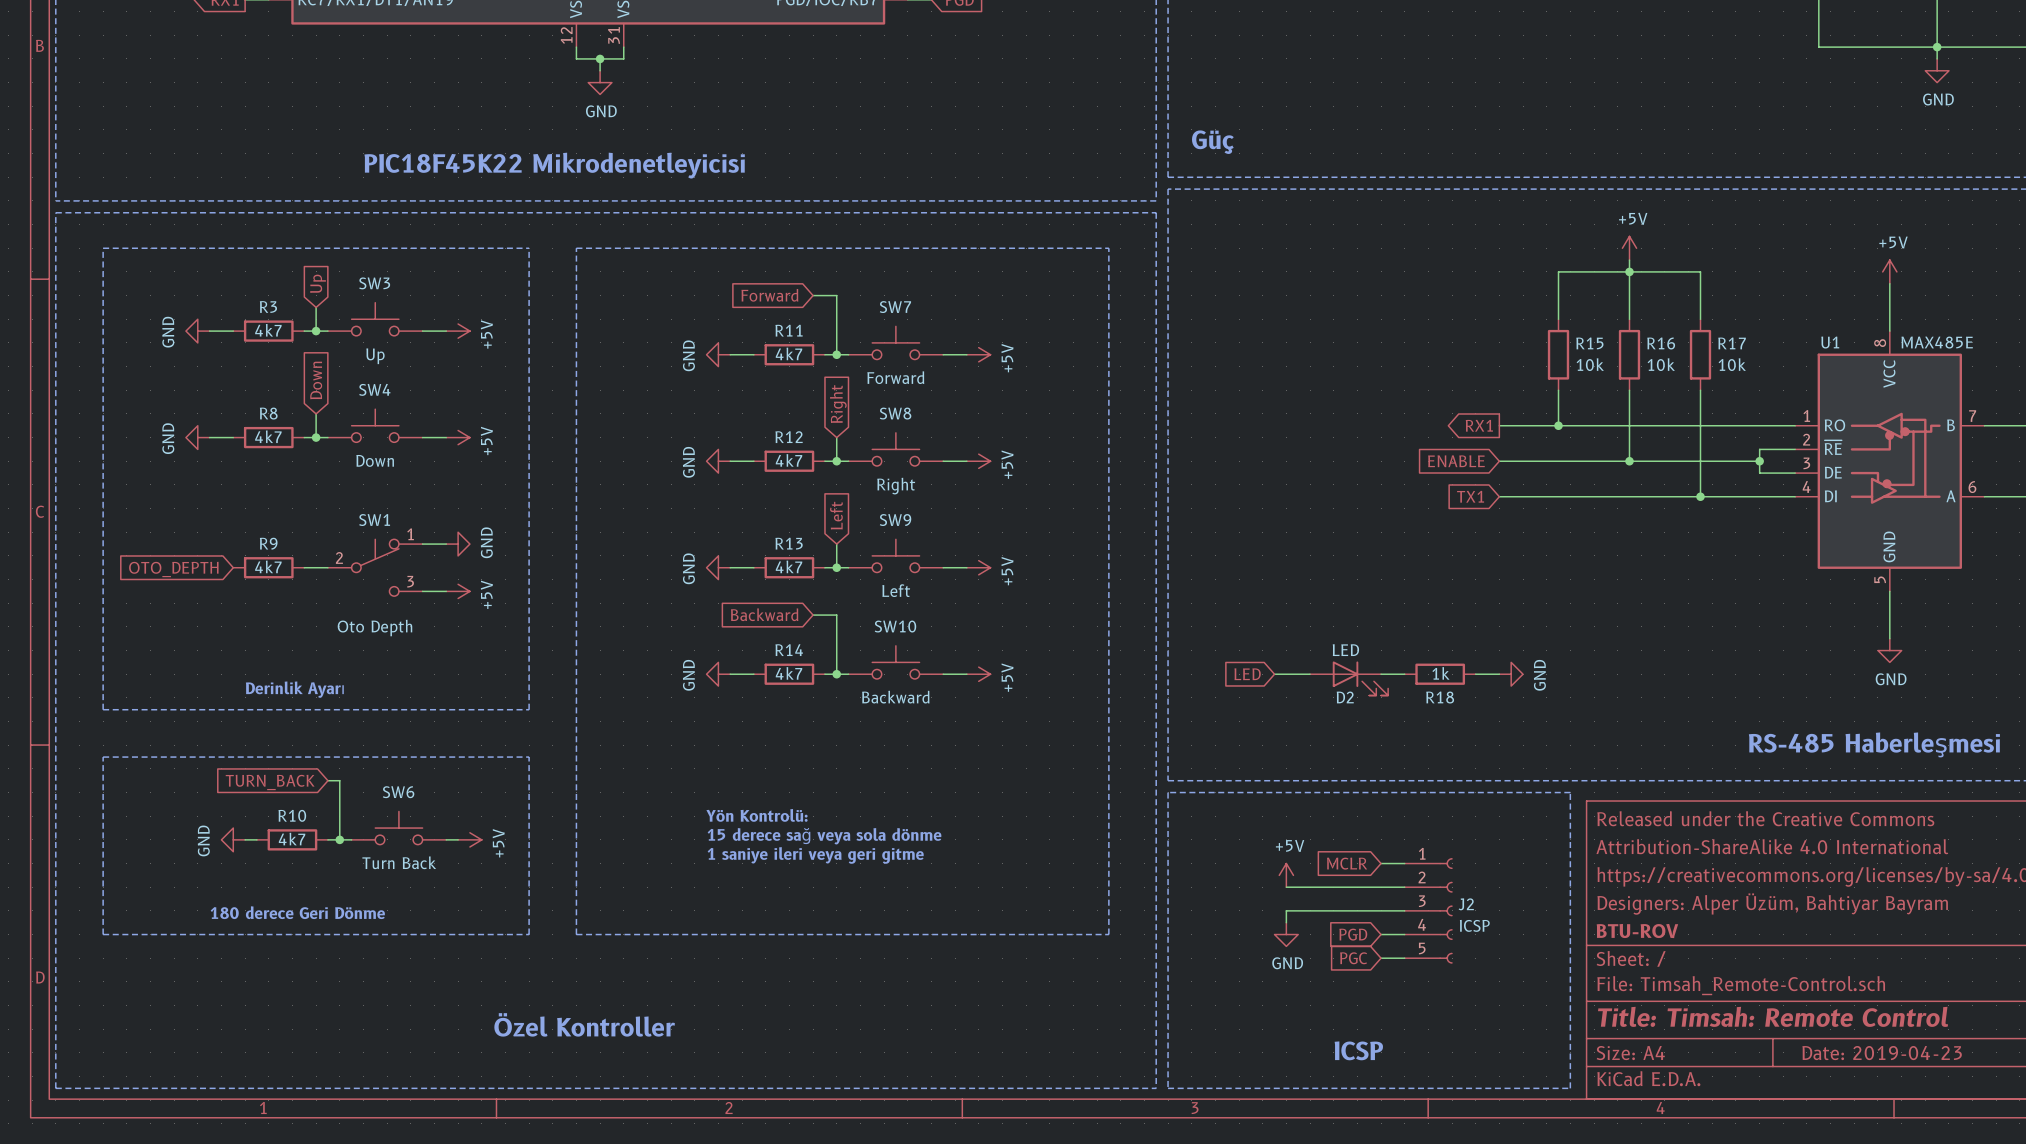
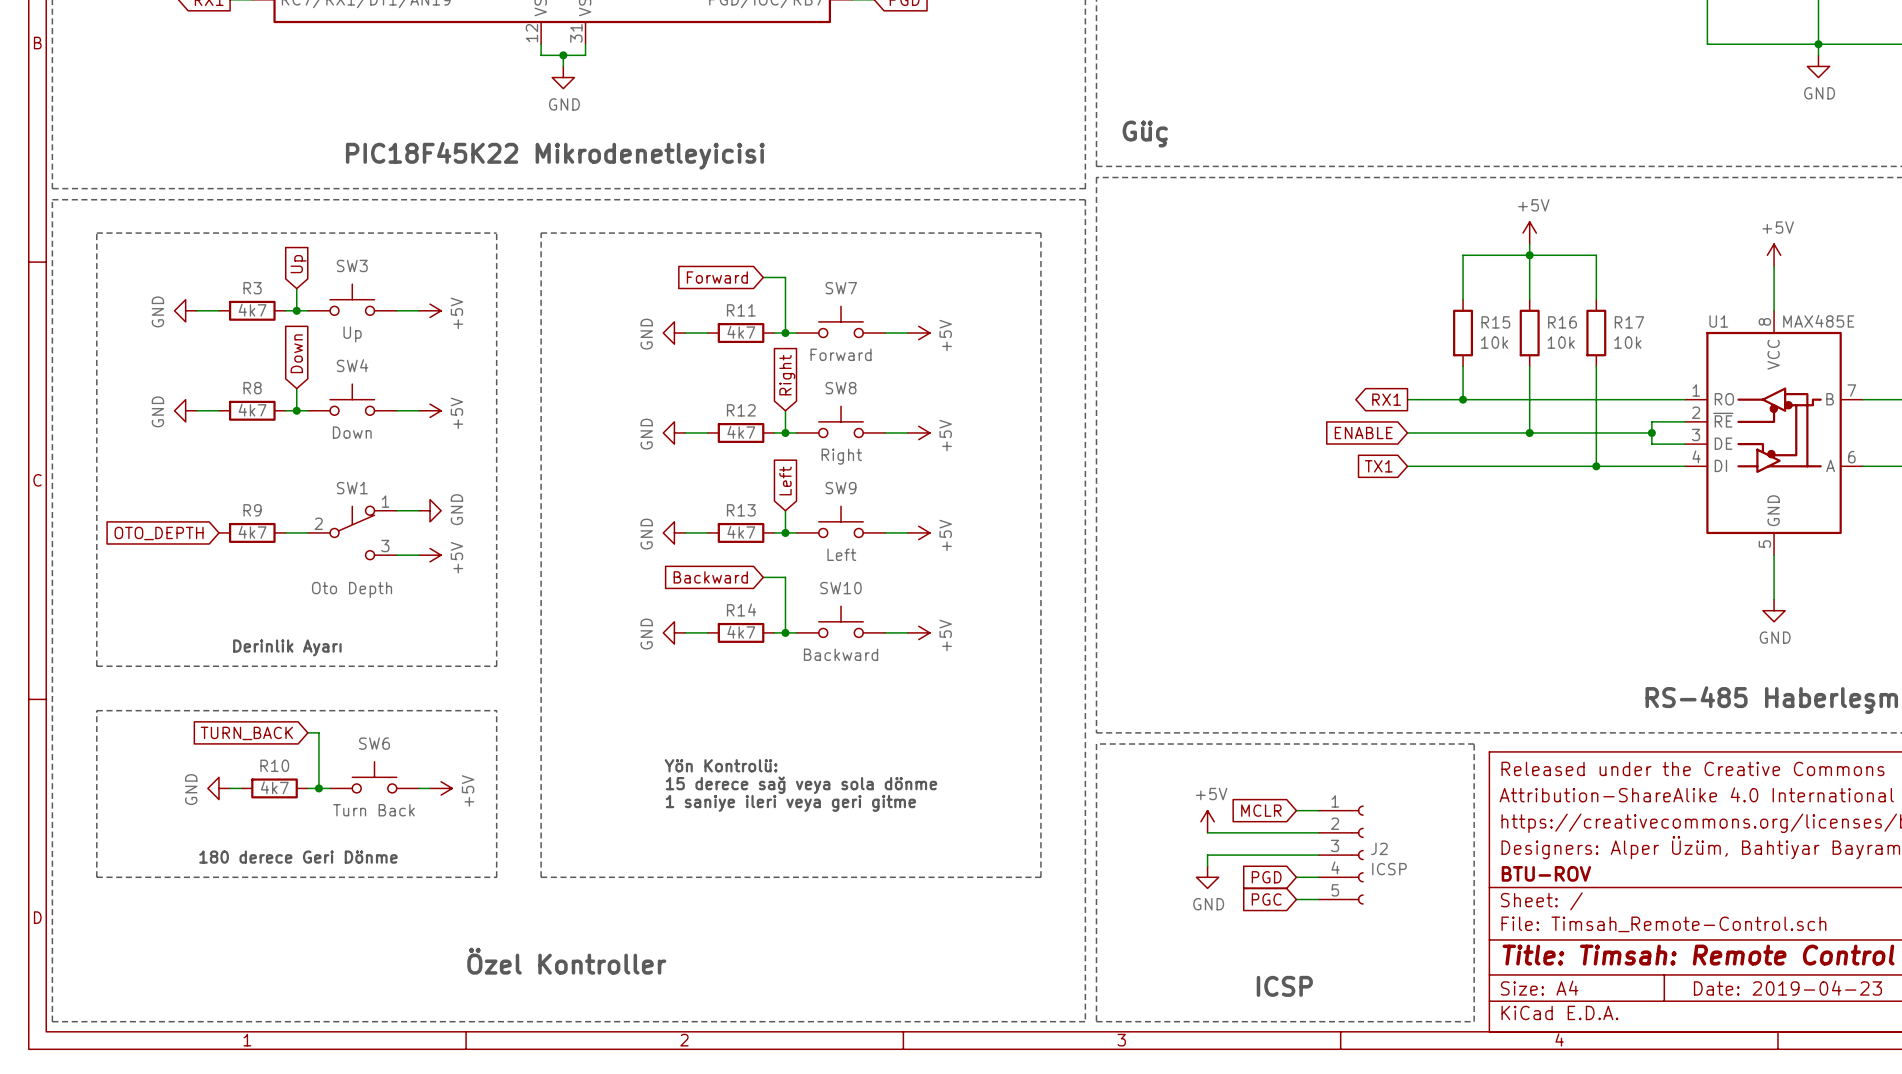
global label: LED (1247, 674) -> none
wire: (1274, 674) (1310, 674) -> none
wire: (1381, 674) (1404, 674) -> none
R18: 1k (1440, 674) -> none
wire: (1475, 674) (1499, 674) -> none
power symbol: GND (1511, 674) -> none
D2: LED (1349, 678) -> none

